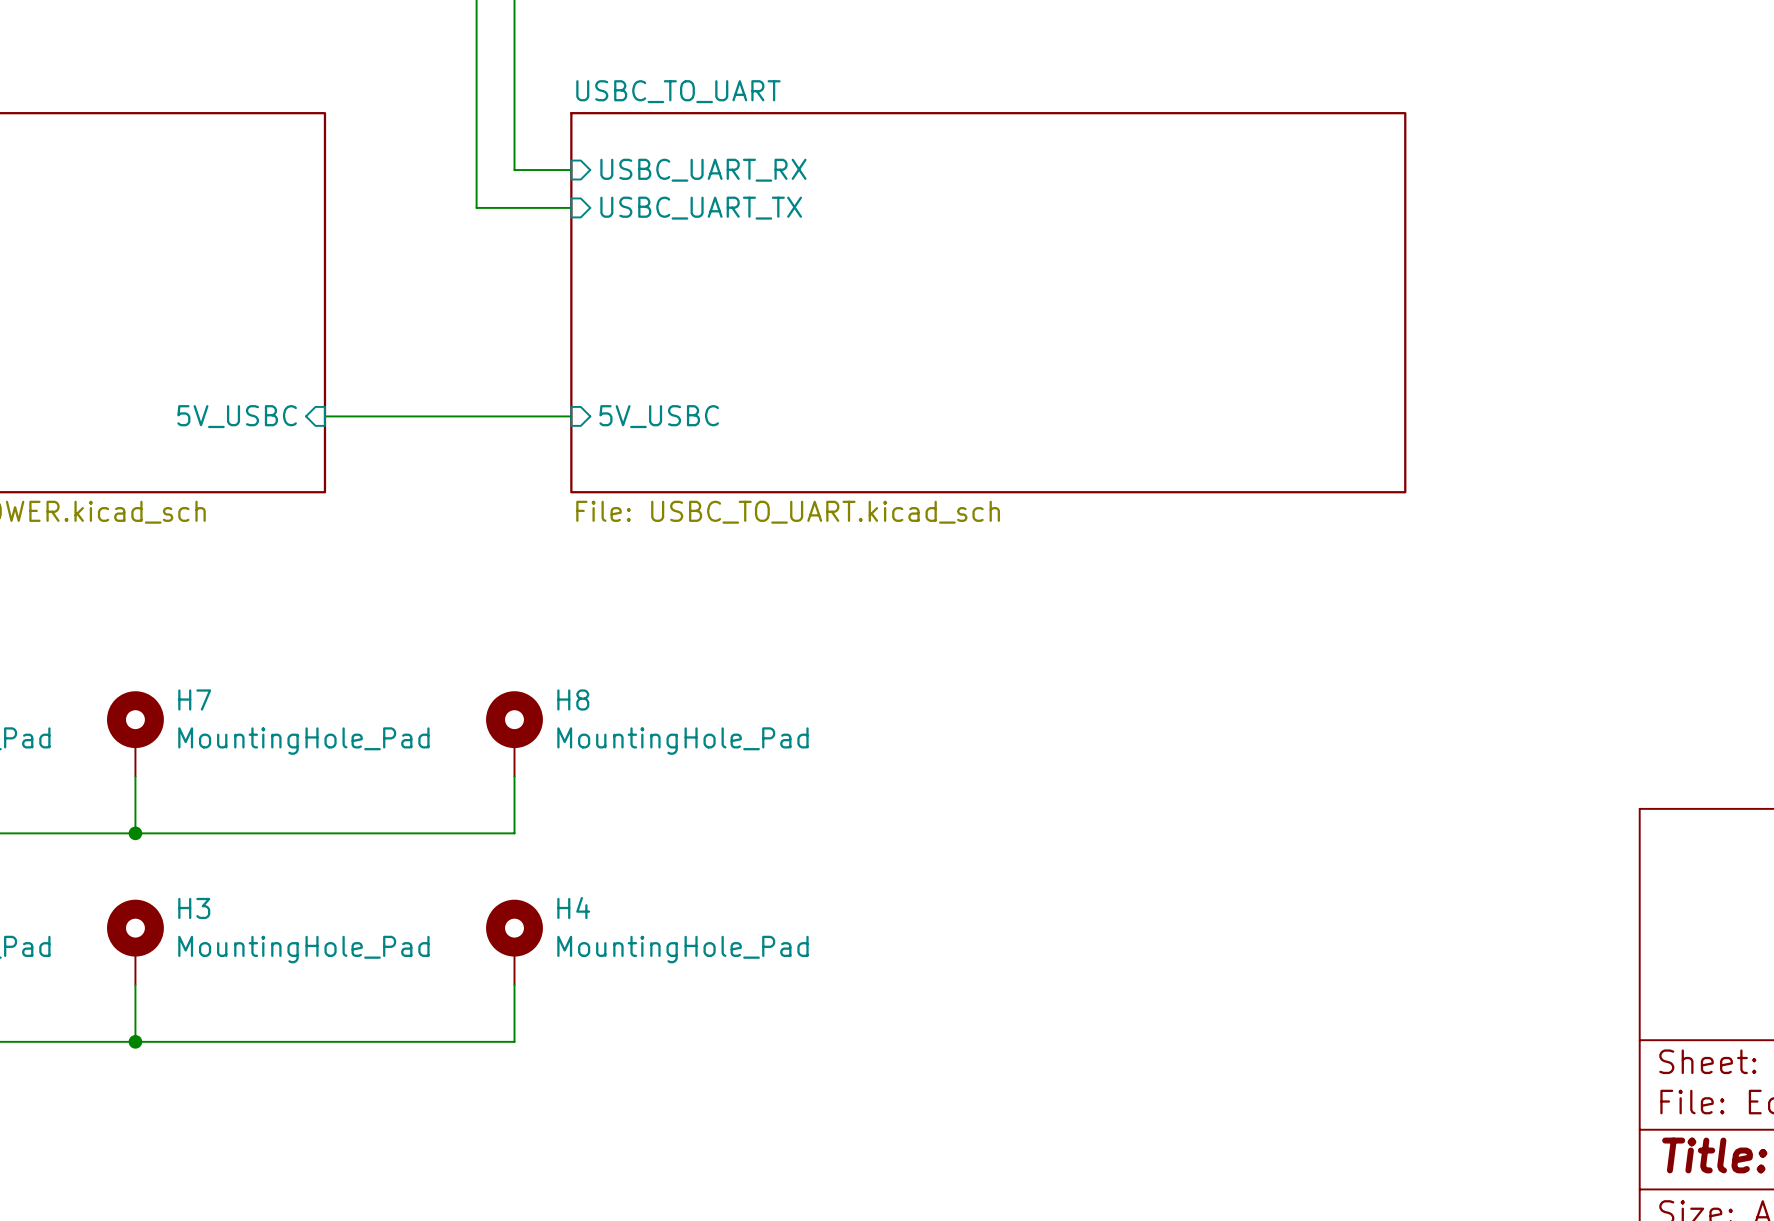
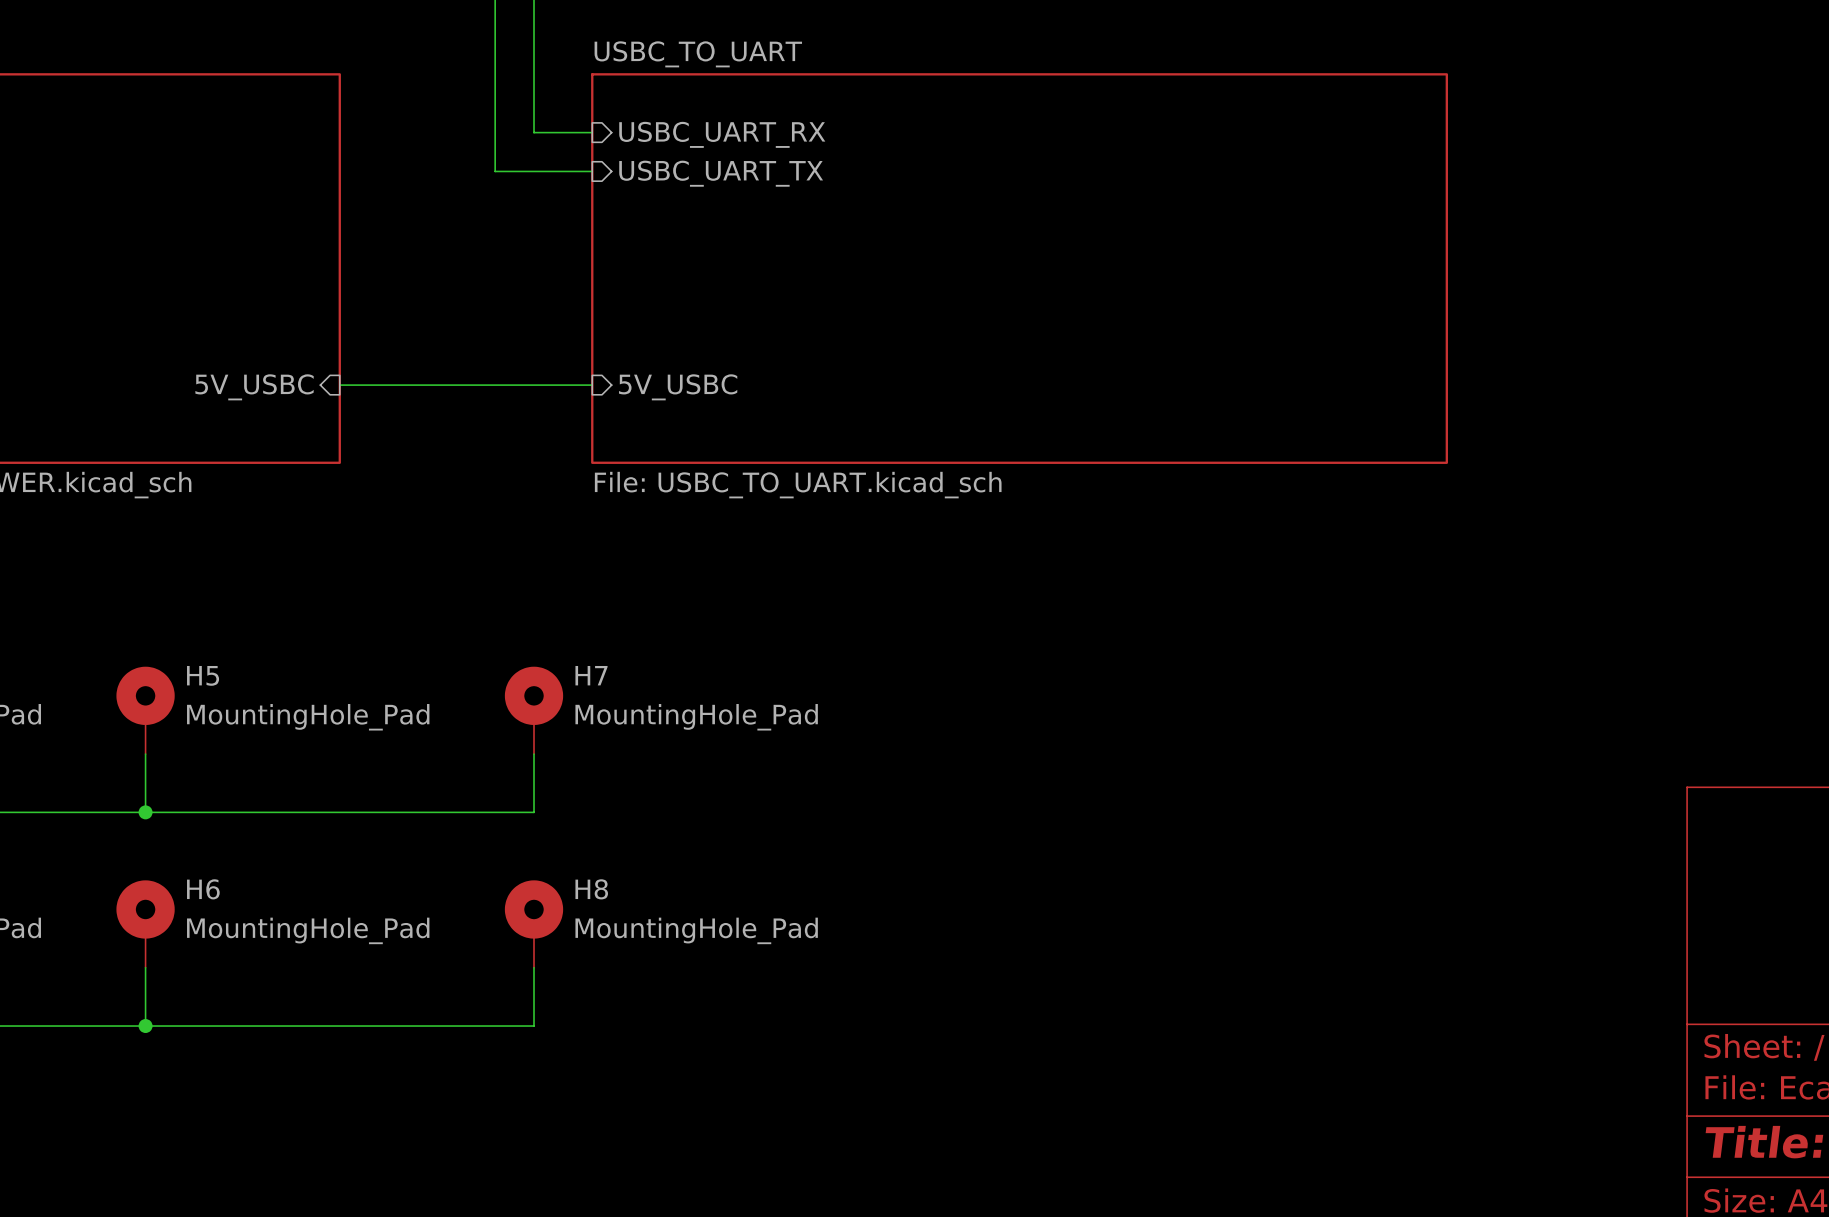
H7 name: H7 (194, 699) -> H5 (203, 675)
H8 name: H8 (573, 699) -> H7 (591, 675)
H3 name: H3 (194, 908) -> H6 (203, 889)
H4 name: H4 (573, 908) -> H8 (591, 889)

